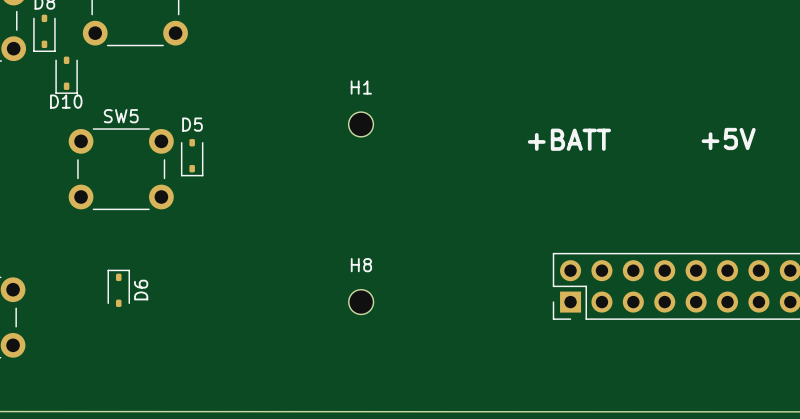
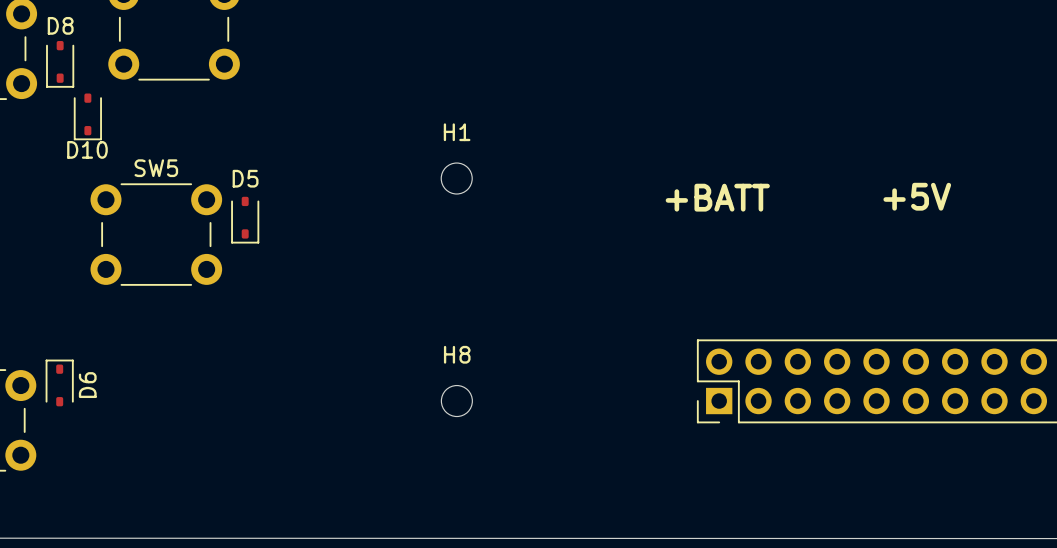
D6 position: (118, 288) -> (59, 382)

